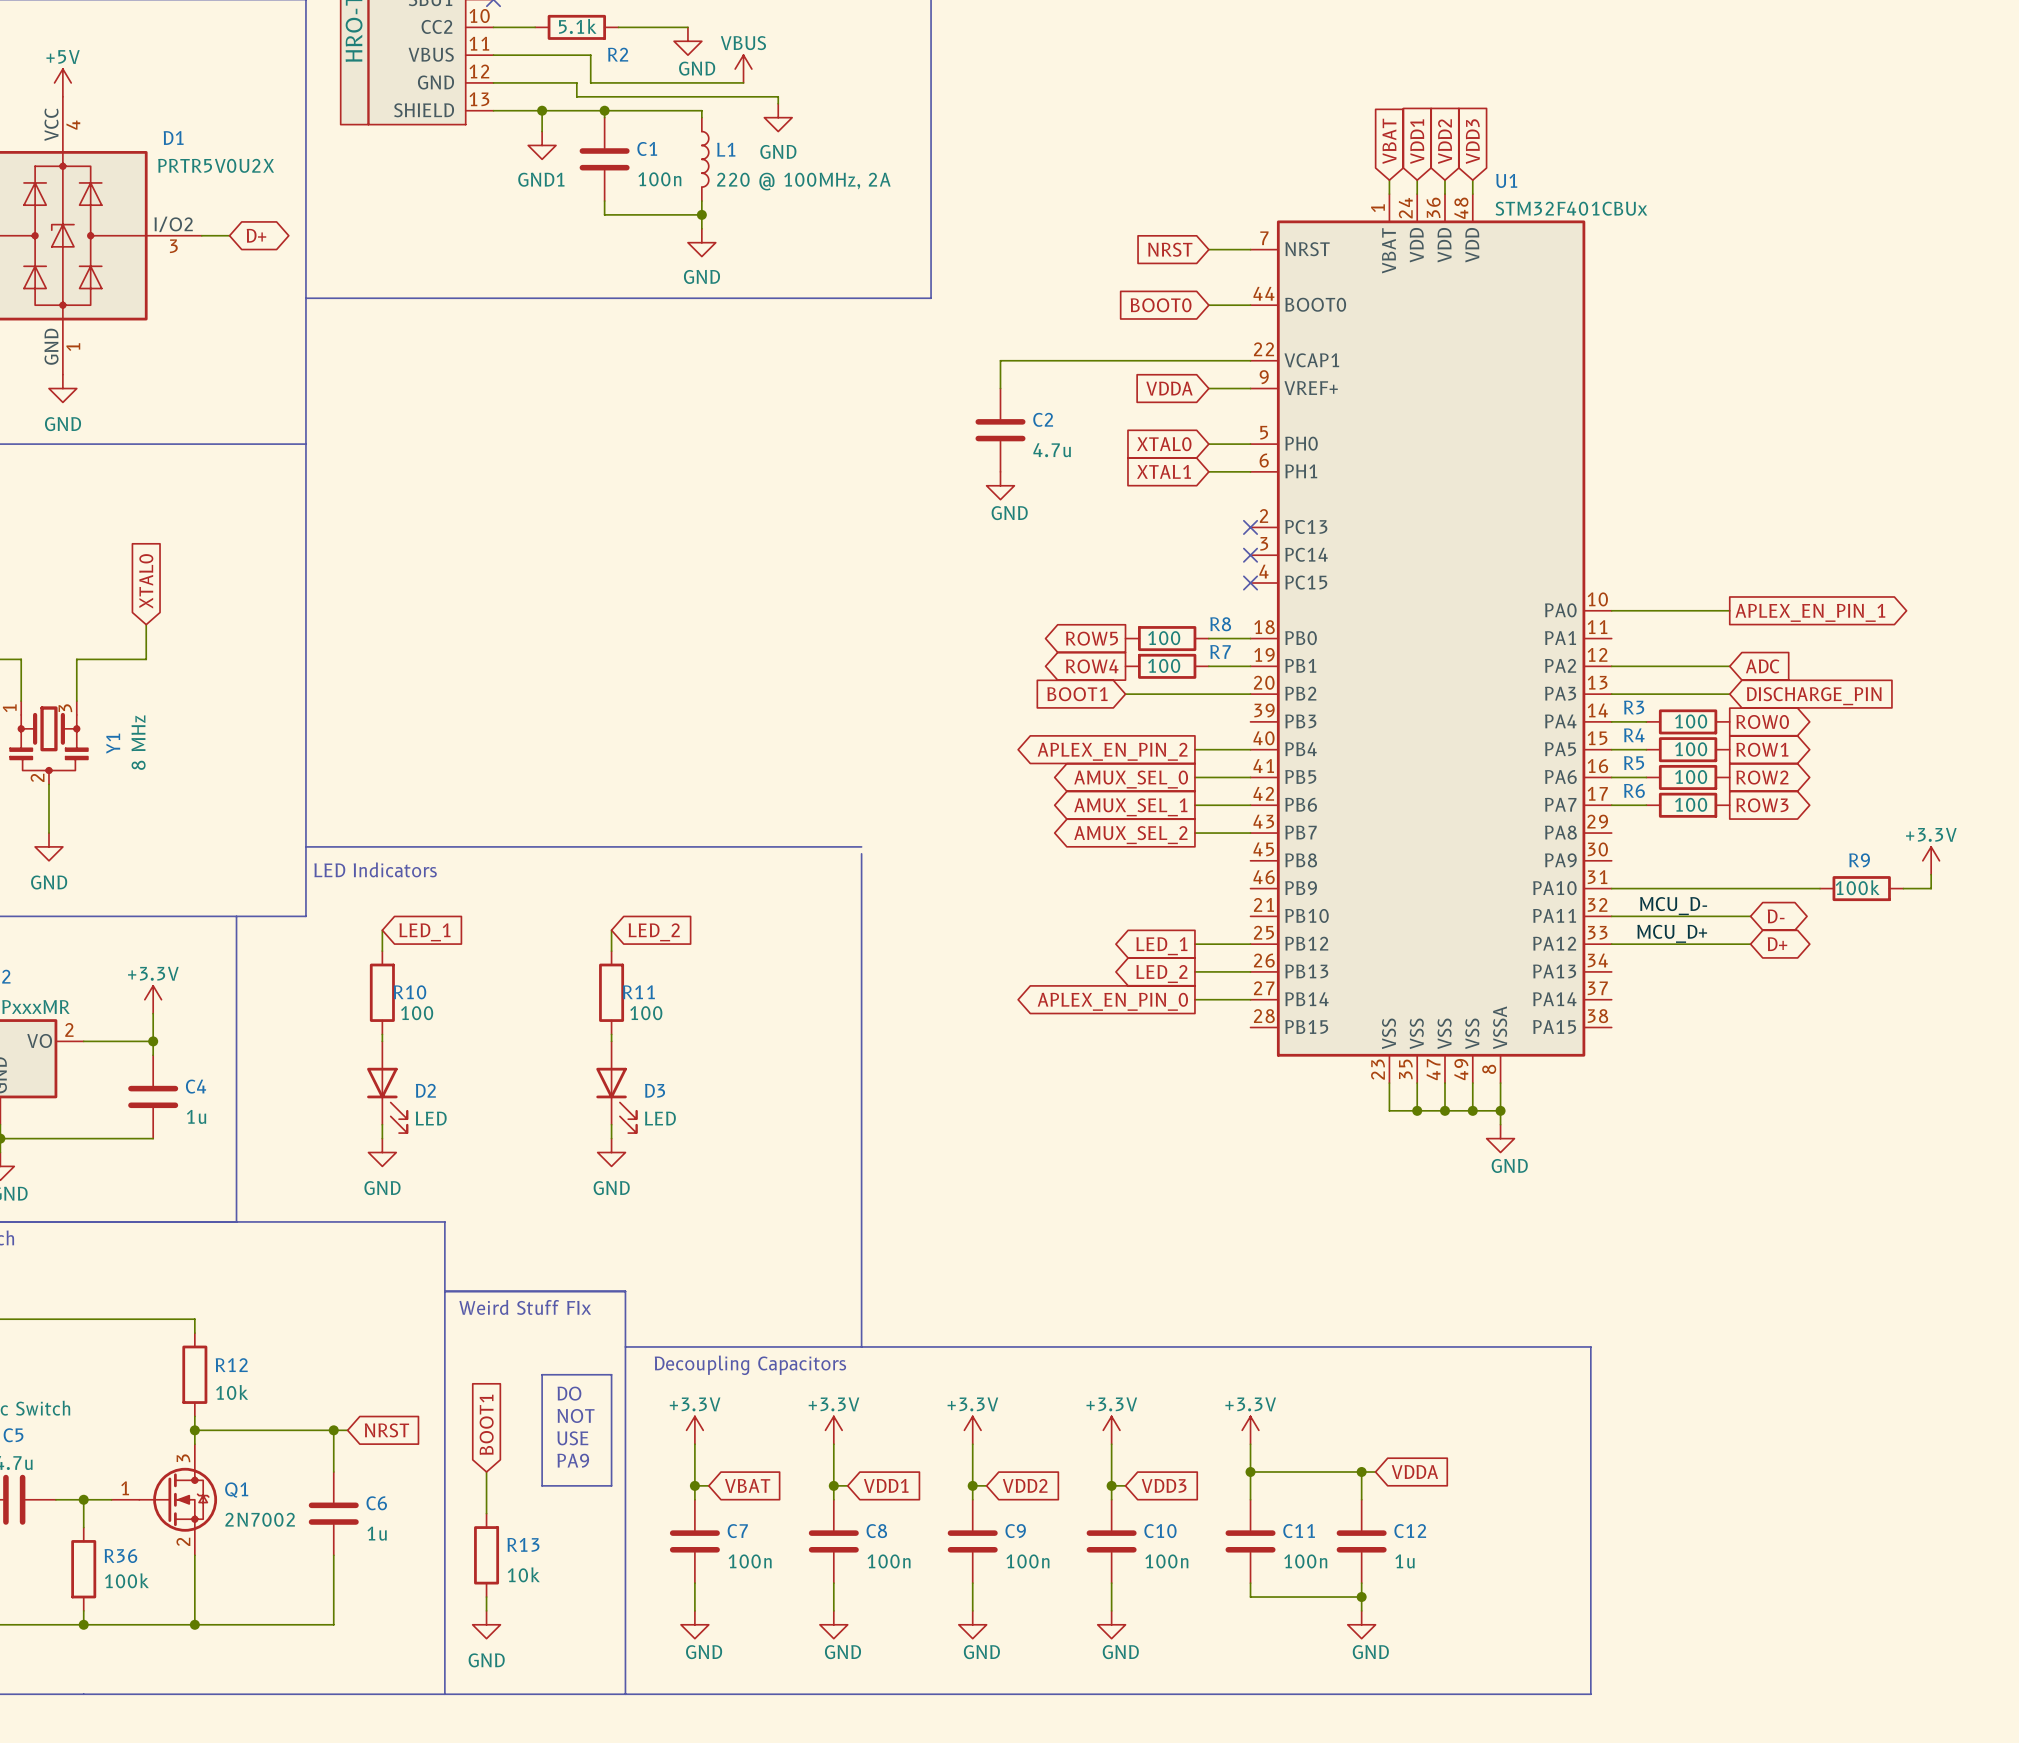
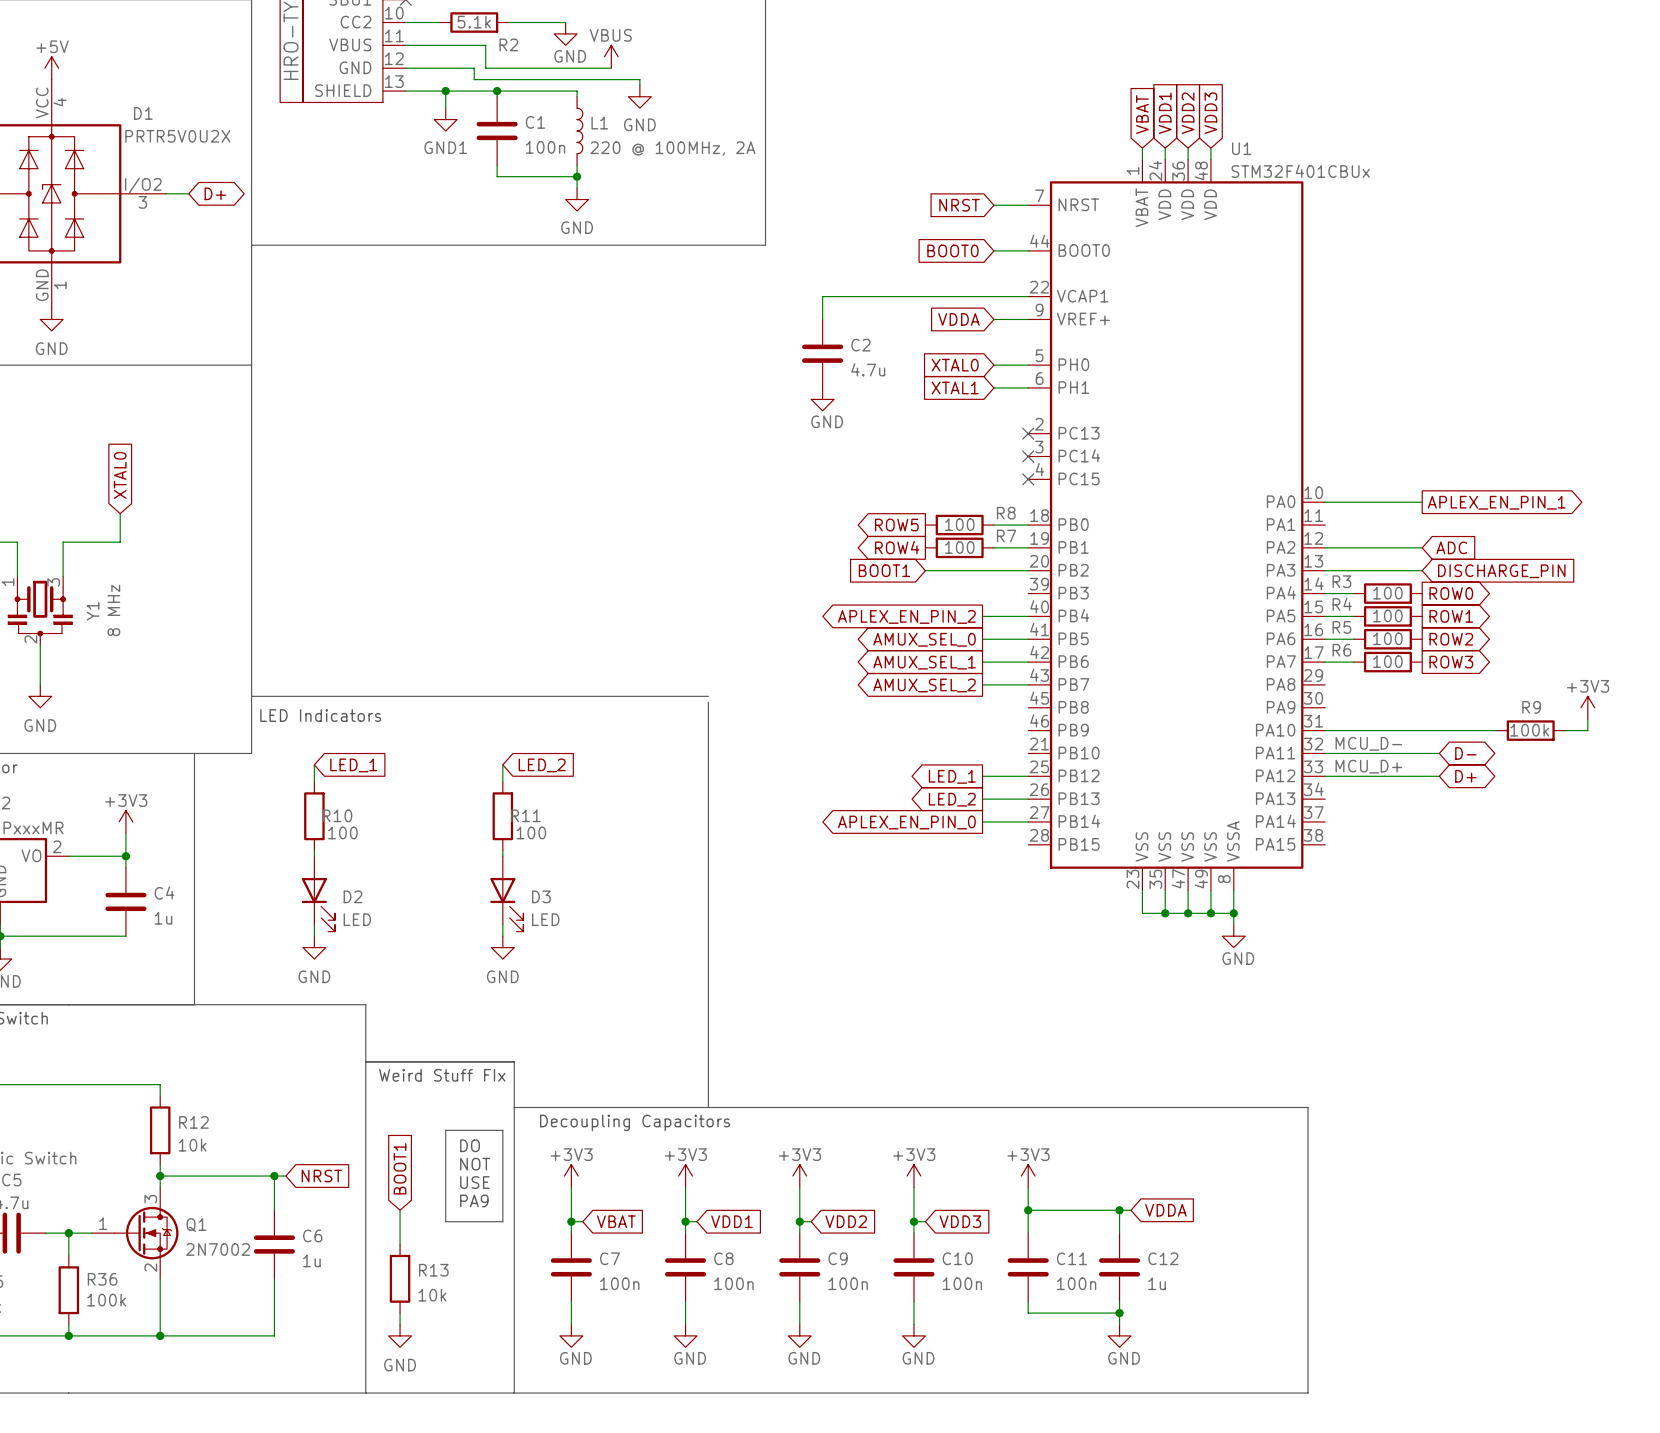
power symbol: +3.3V (1931, 860) -> +3V3 (1587, 707)
power symbol: +3.3V (153, 999) -> +3V3 (125, 821)
power symbol: +3.3V (694, 1430) -> +3V3 (571, 1176)
power symbol: +3.3V (833, 1430) -> +3V3 (685, 1176)
power symbol: +3.3V (972, 1430) -> +3V3 (799, 1176)
power symbol: +3.3V (1111, 1430) -> +3V3 (913, 1176)
power symbol: +3.3V (1250, 1430) -> +3V3 (1028, 1176)

